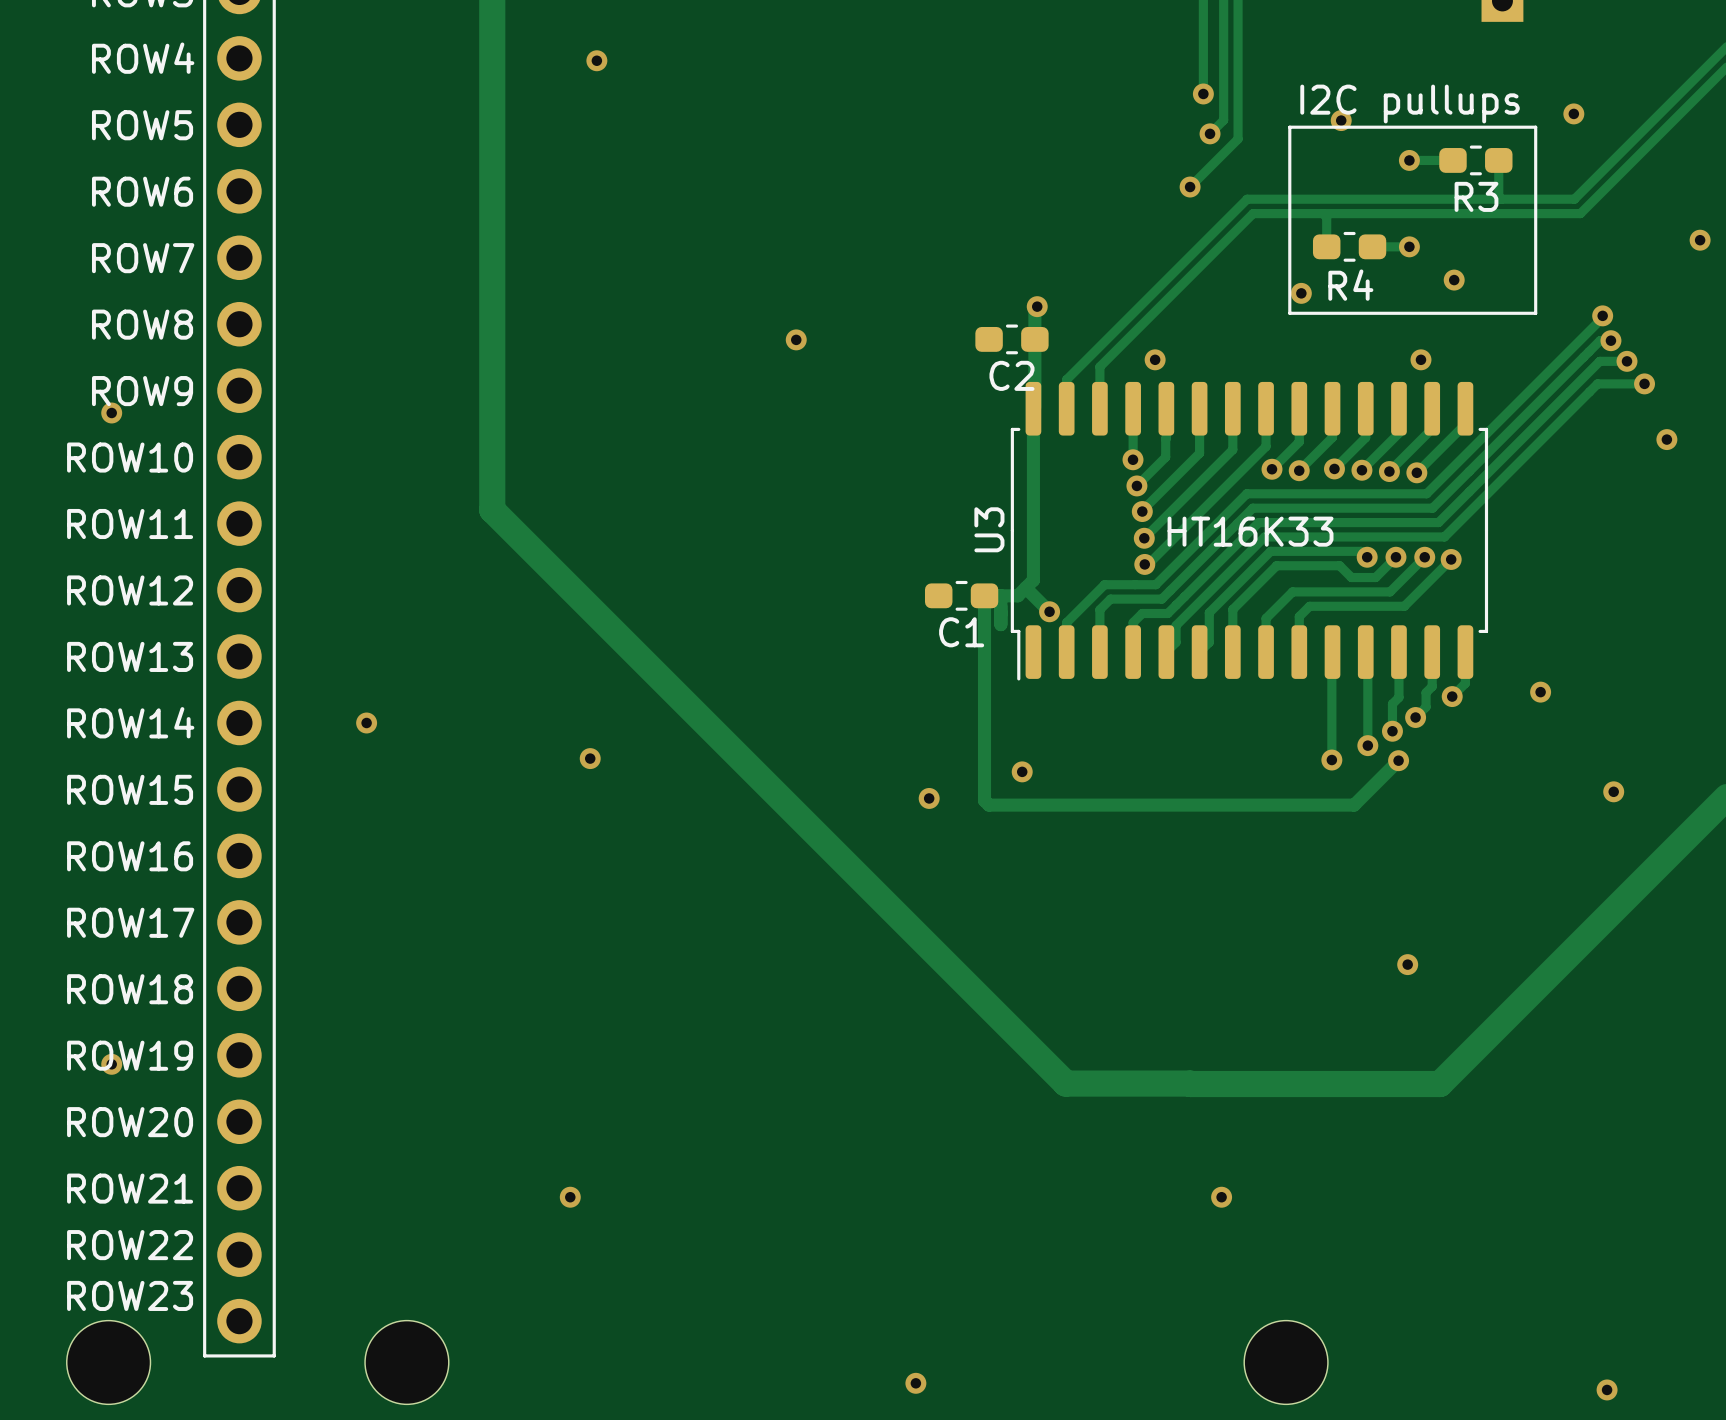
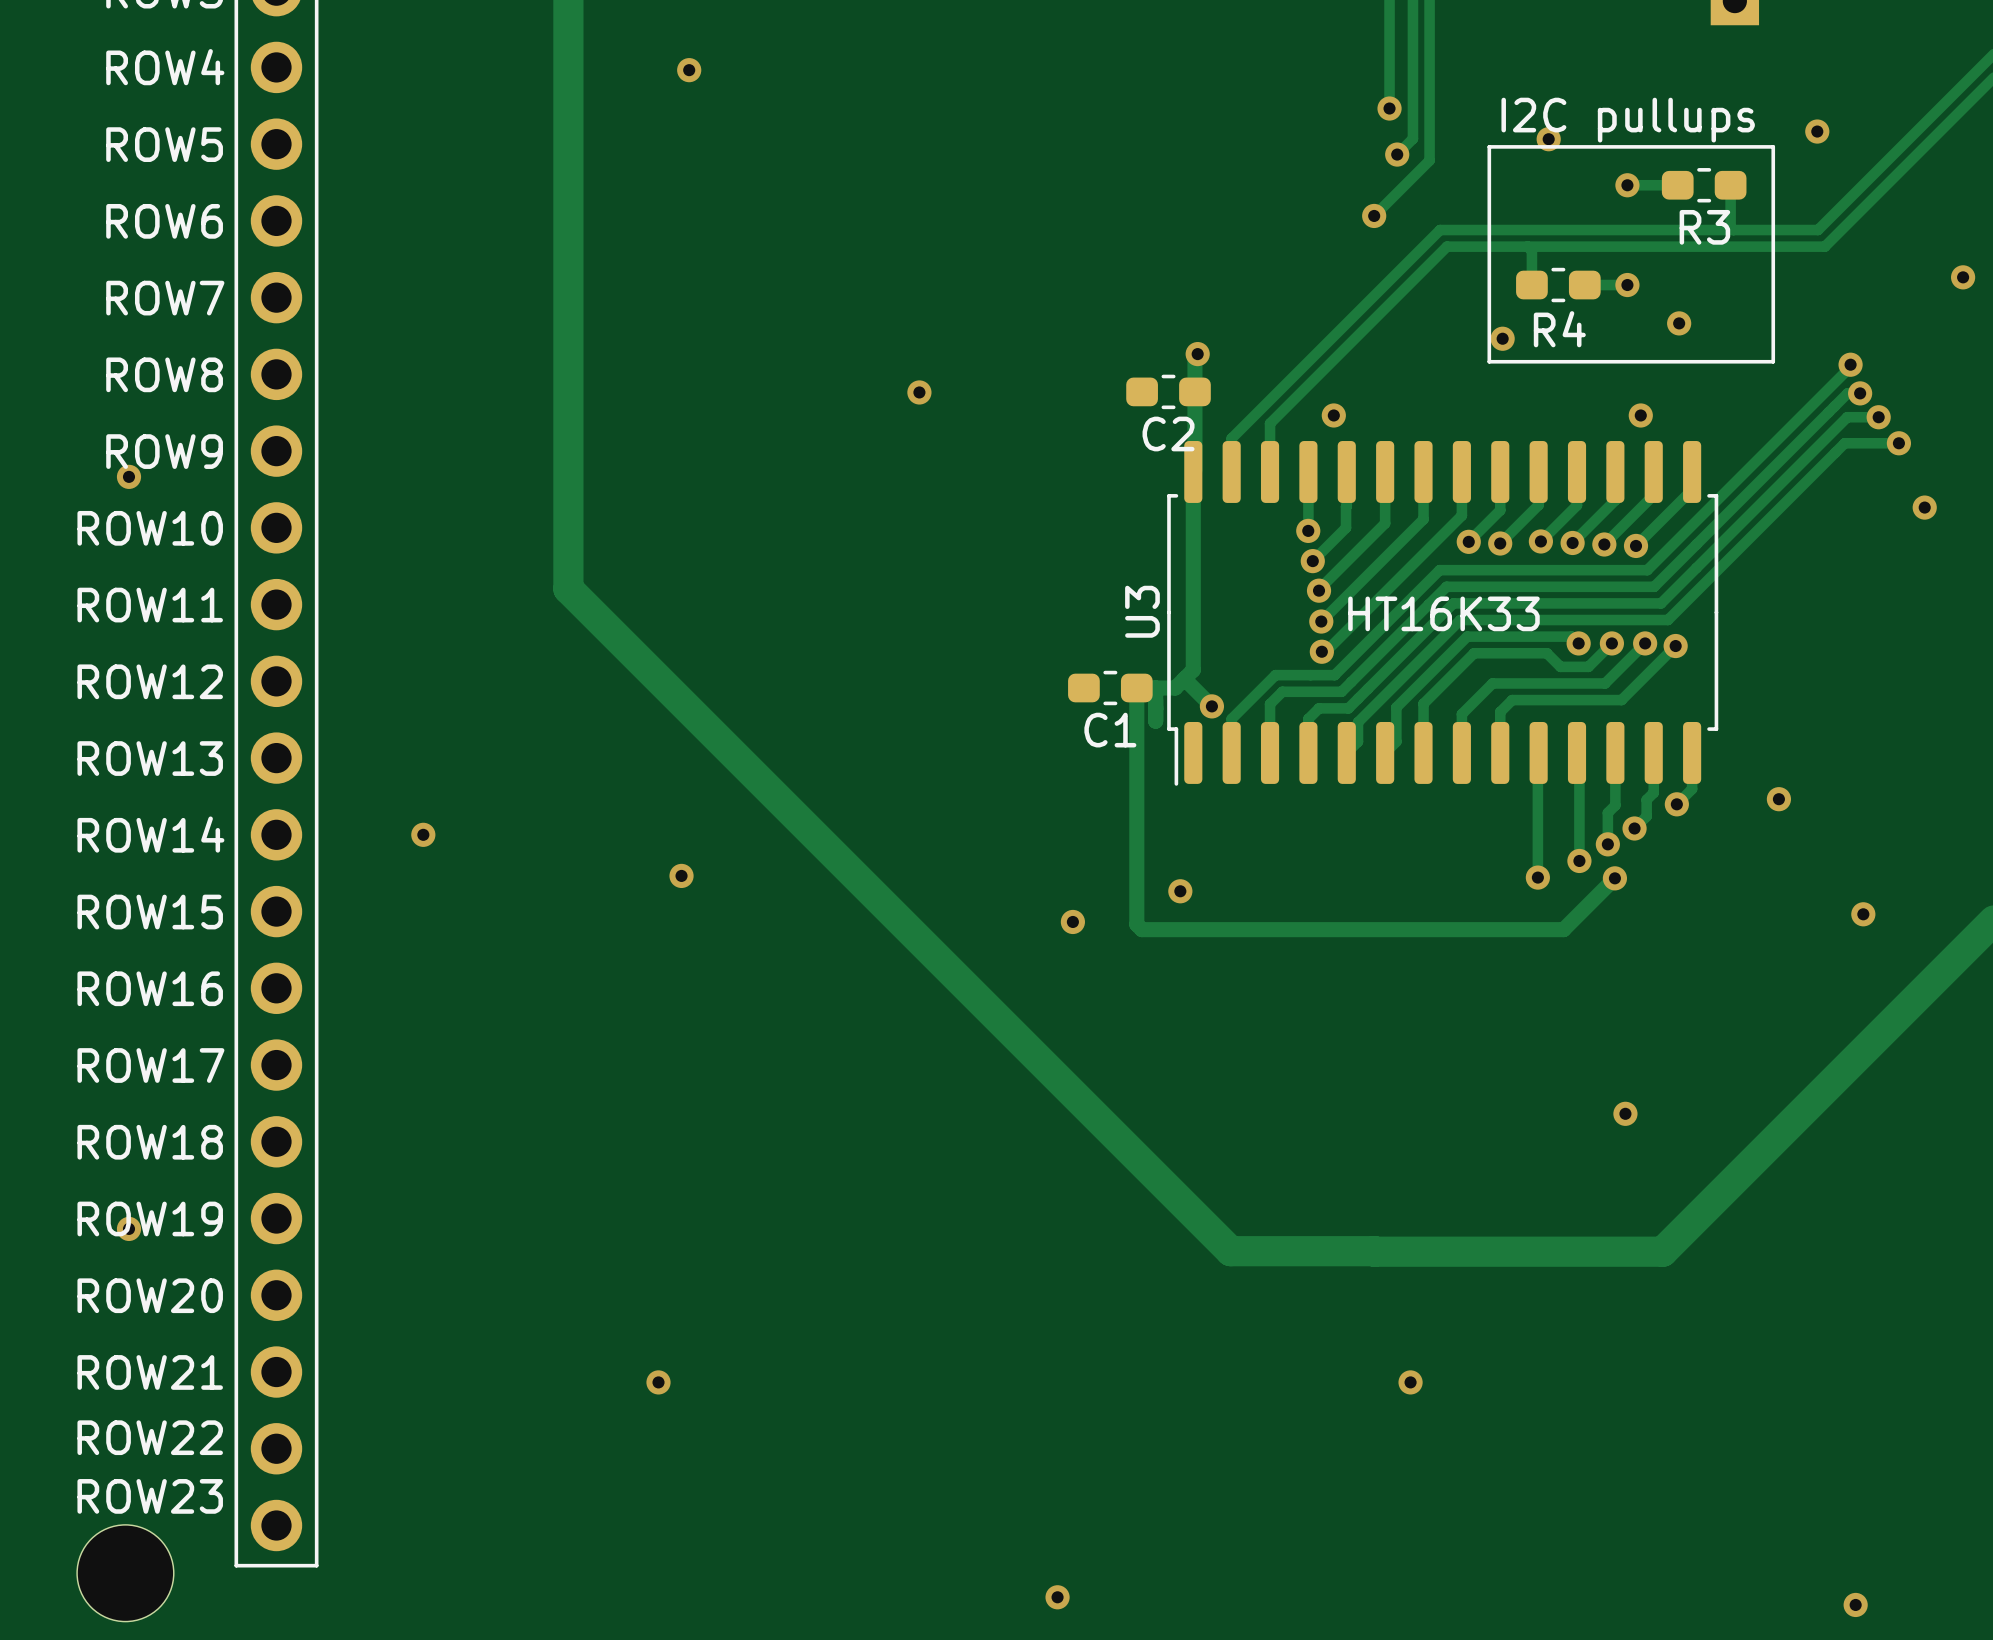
part: (406, 1362) -> none
part: (1286, 1362) -> none

